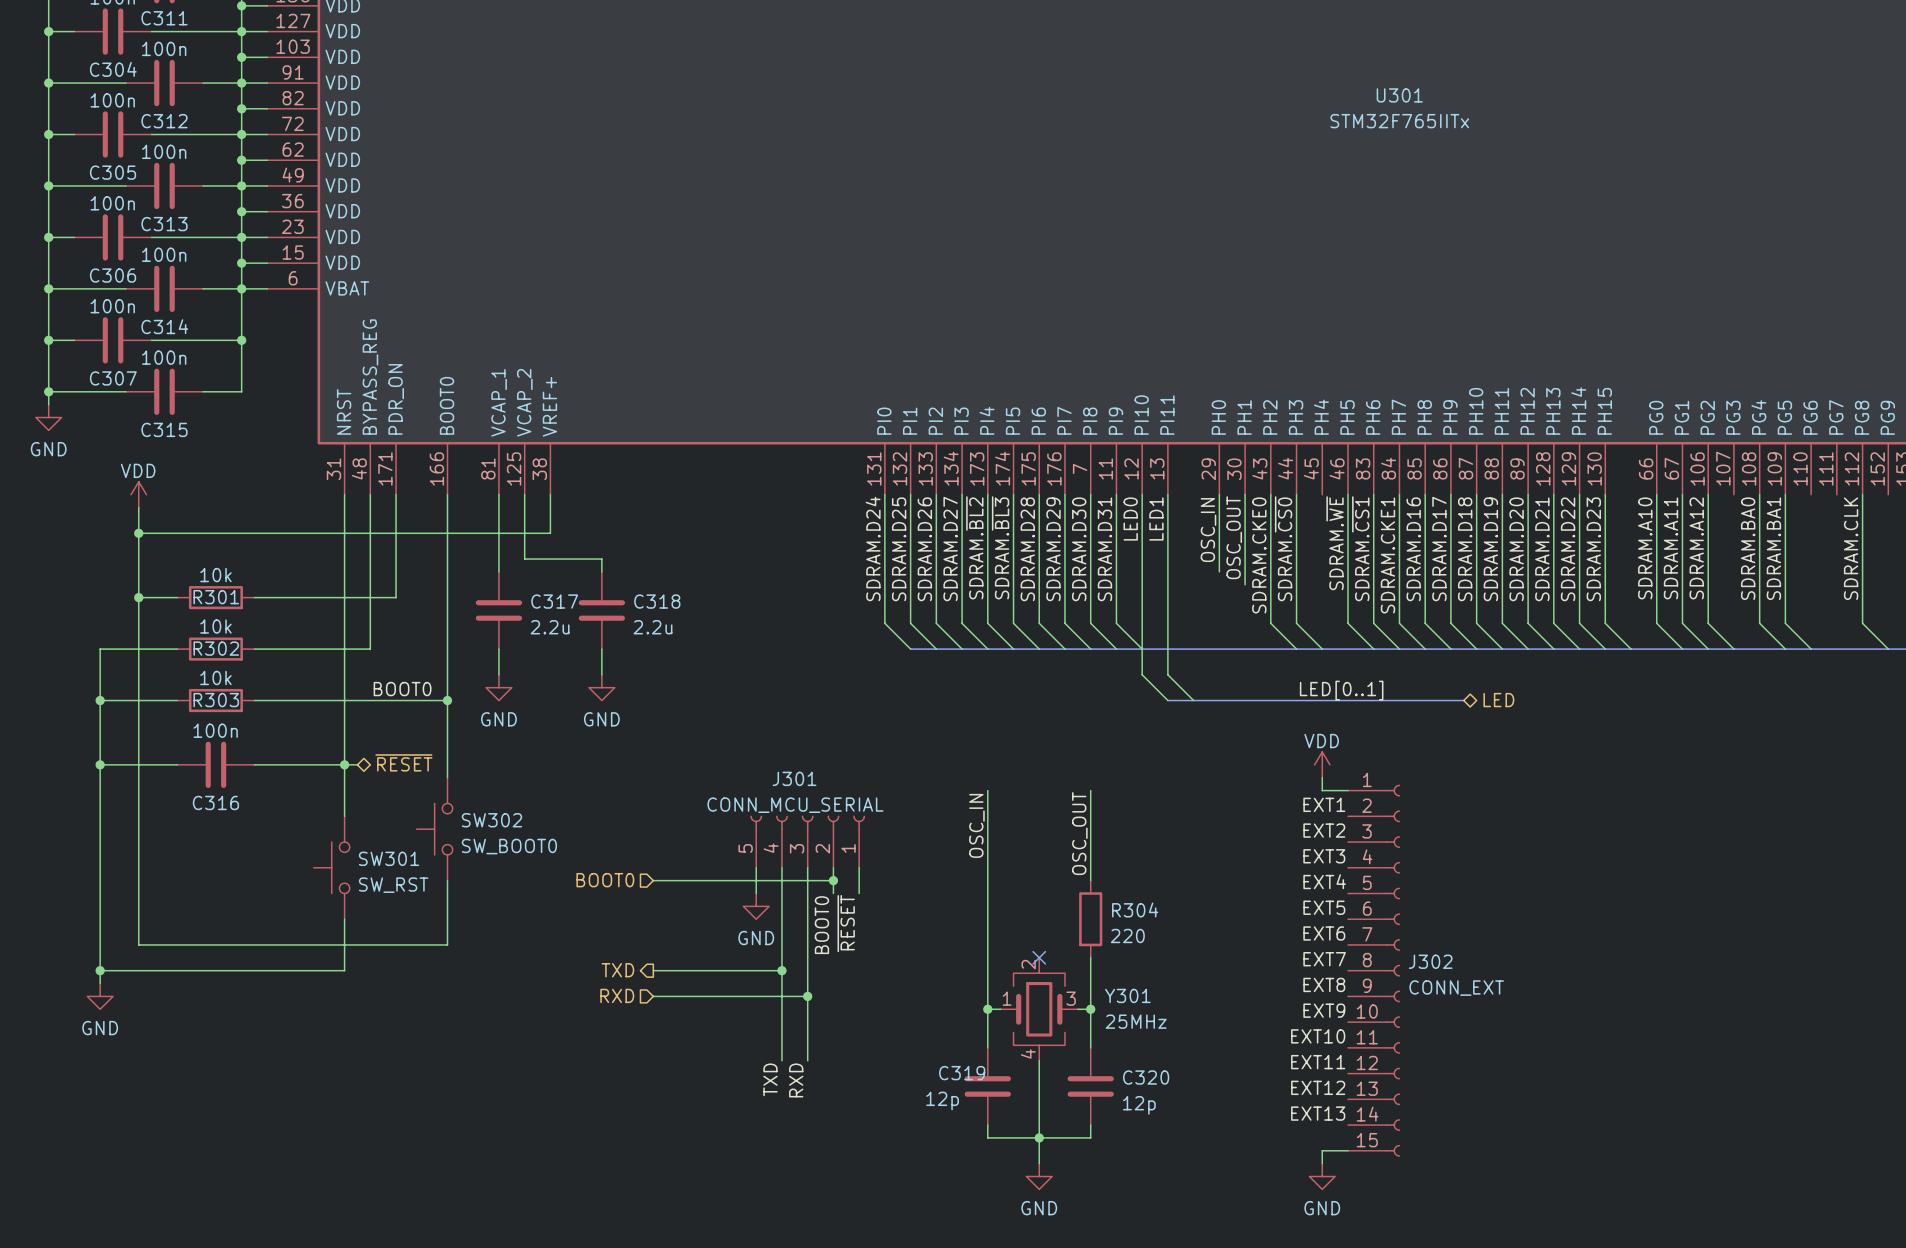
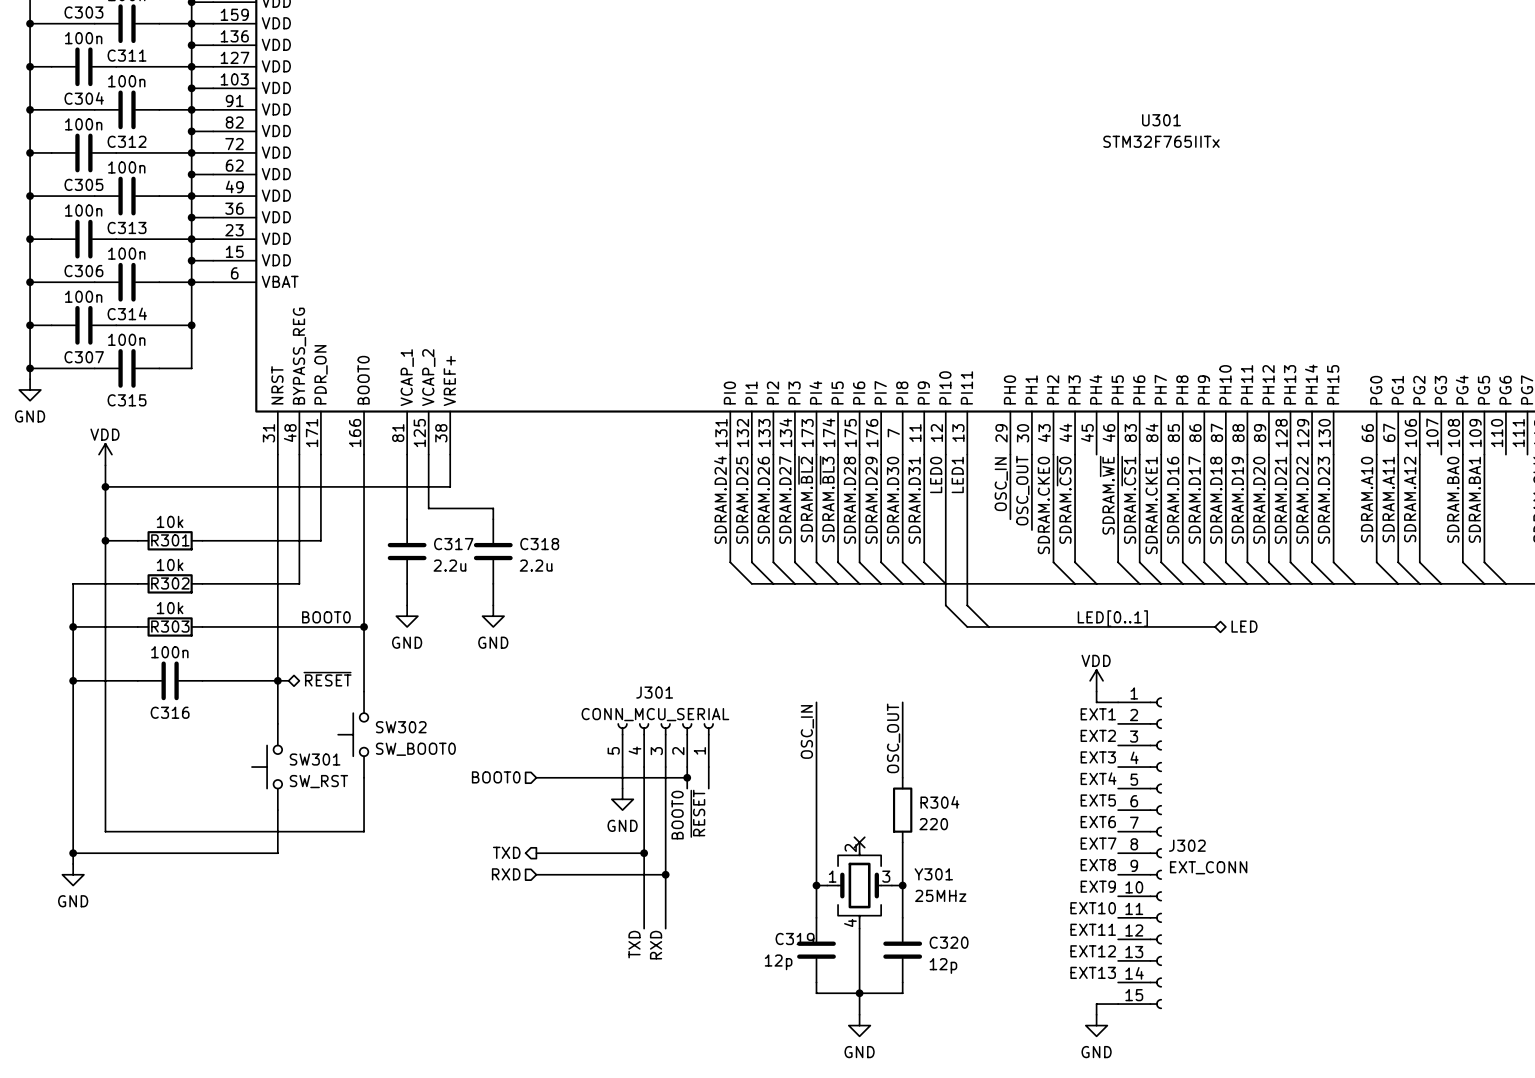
J302 value: CONN_EXT (1456, 988) -> EXT_CONN (1208, 867)

